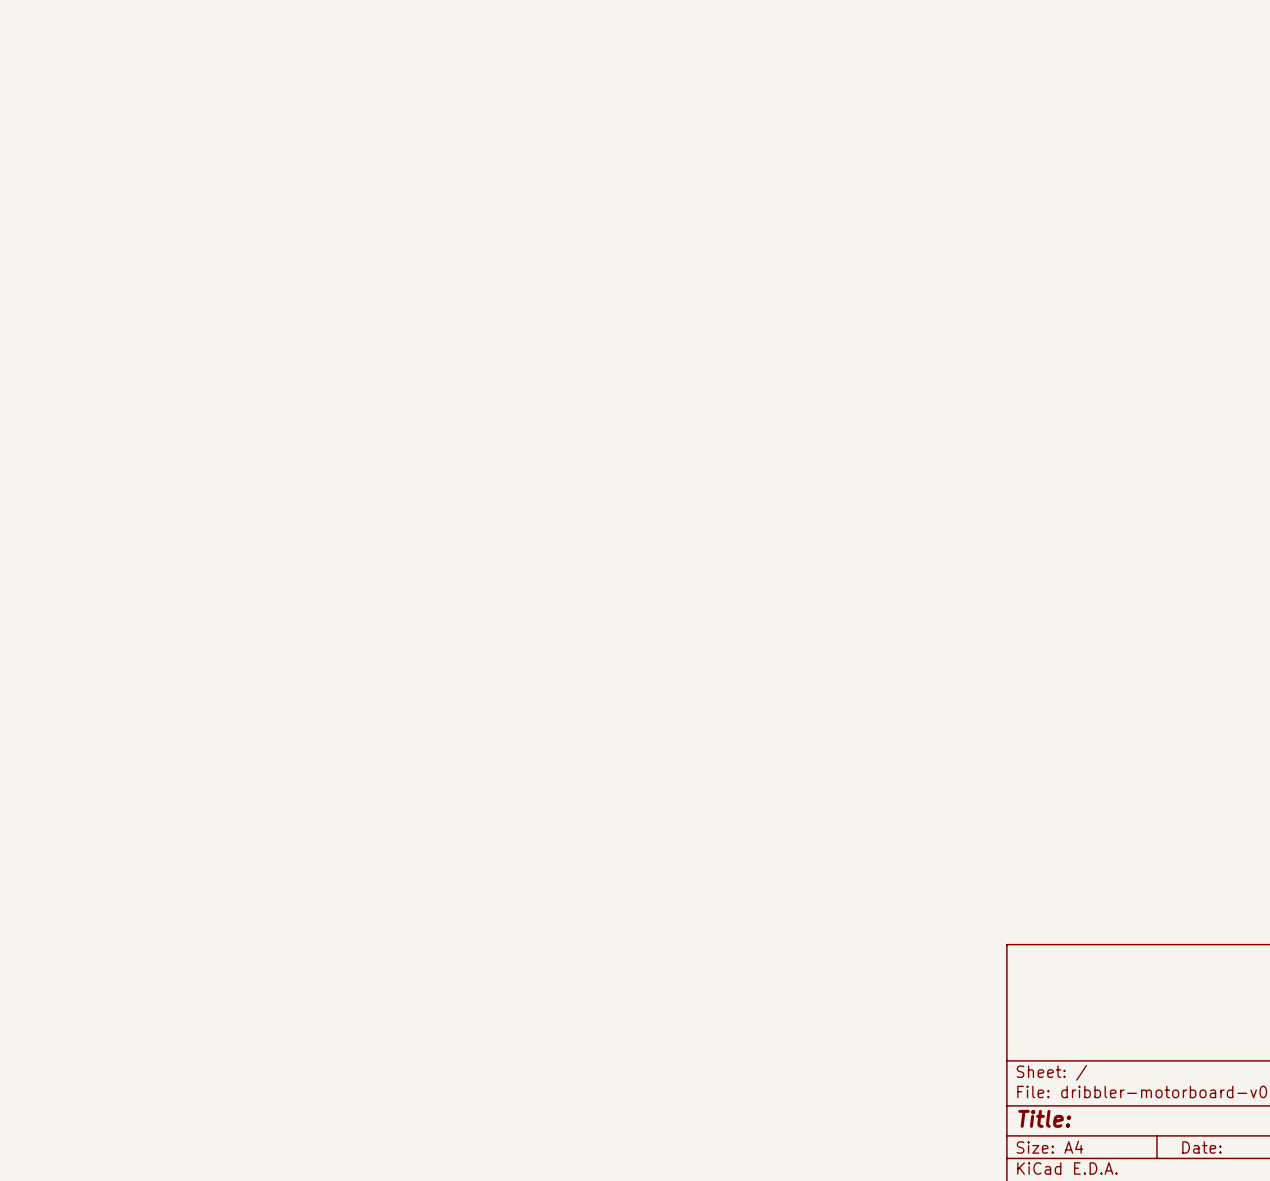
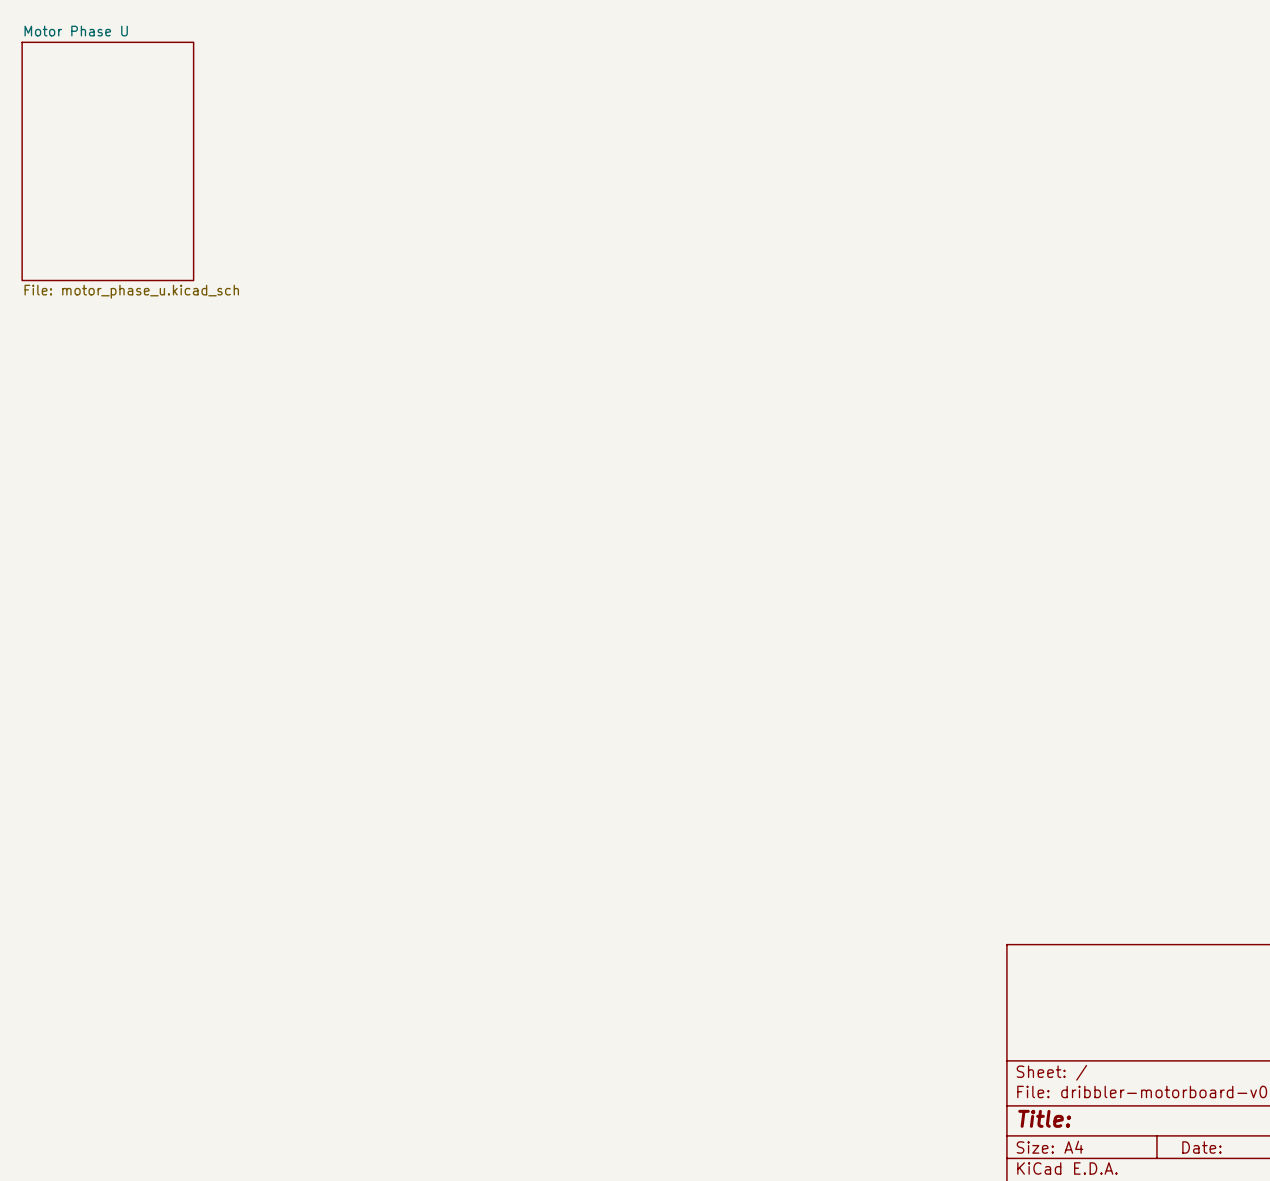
sheet Motor Phase U: none -> File: motor_phase_u.kicad_sch (107, 161)

